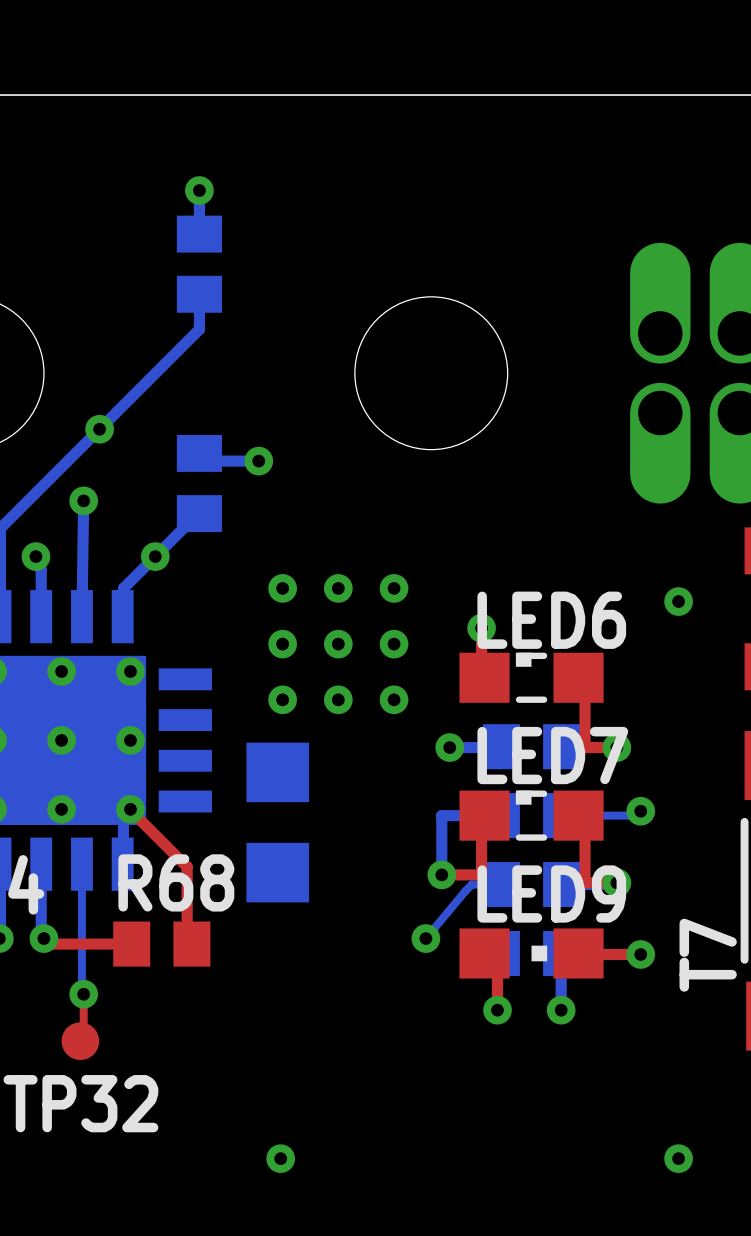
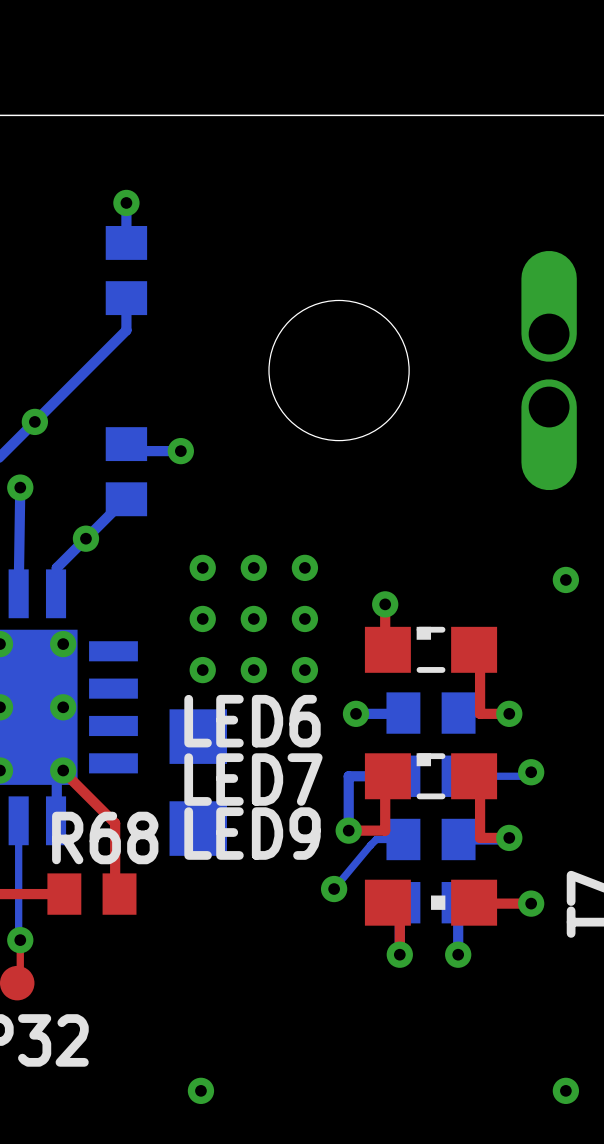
LED6 name position: LED6 (551, 620) -> LED6 (252, 721)
LED7 name position: LED7 (552, 755) -> LED7 (253, 779)
LED9 name position: LED9 (551, 894) -> LED9 (252, 833)

